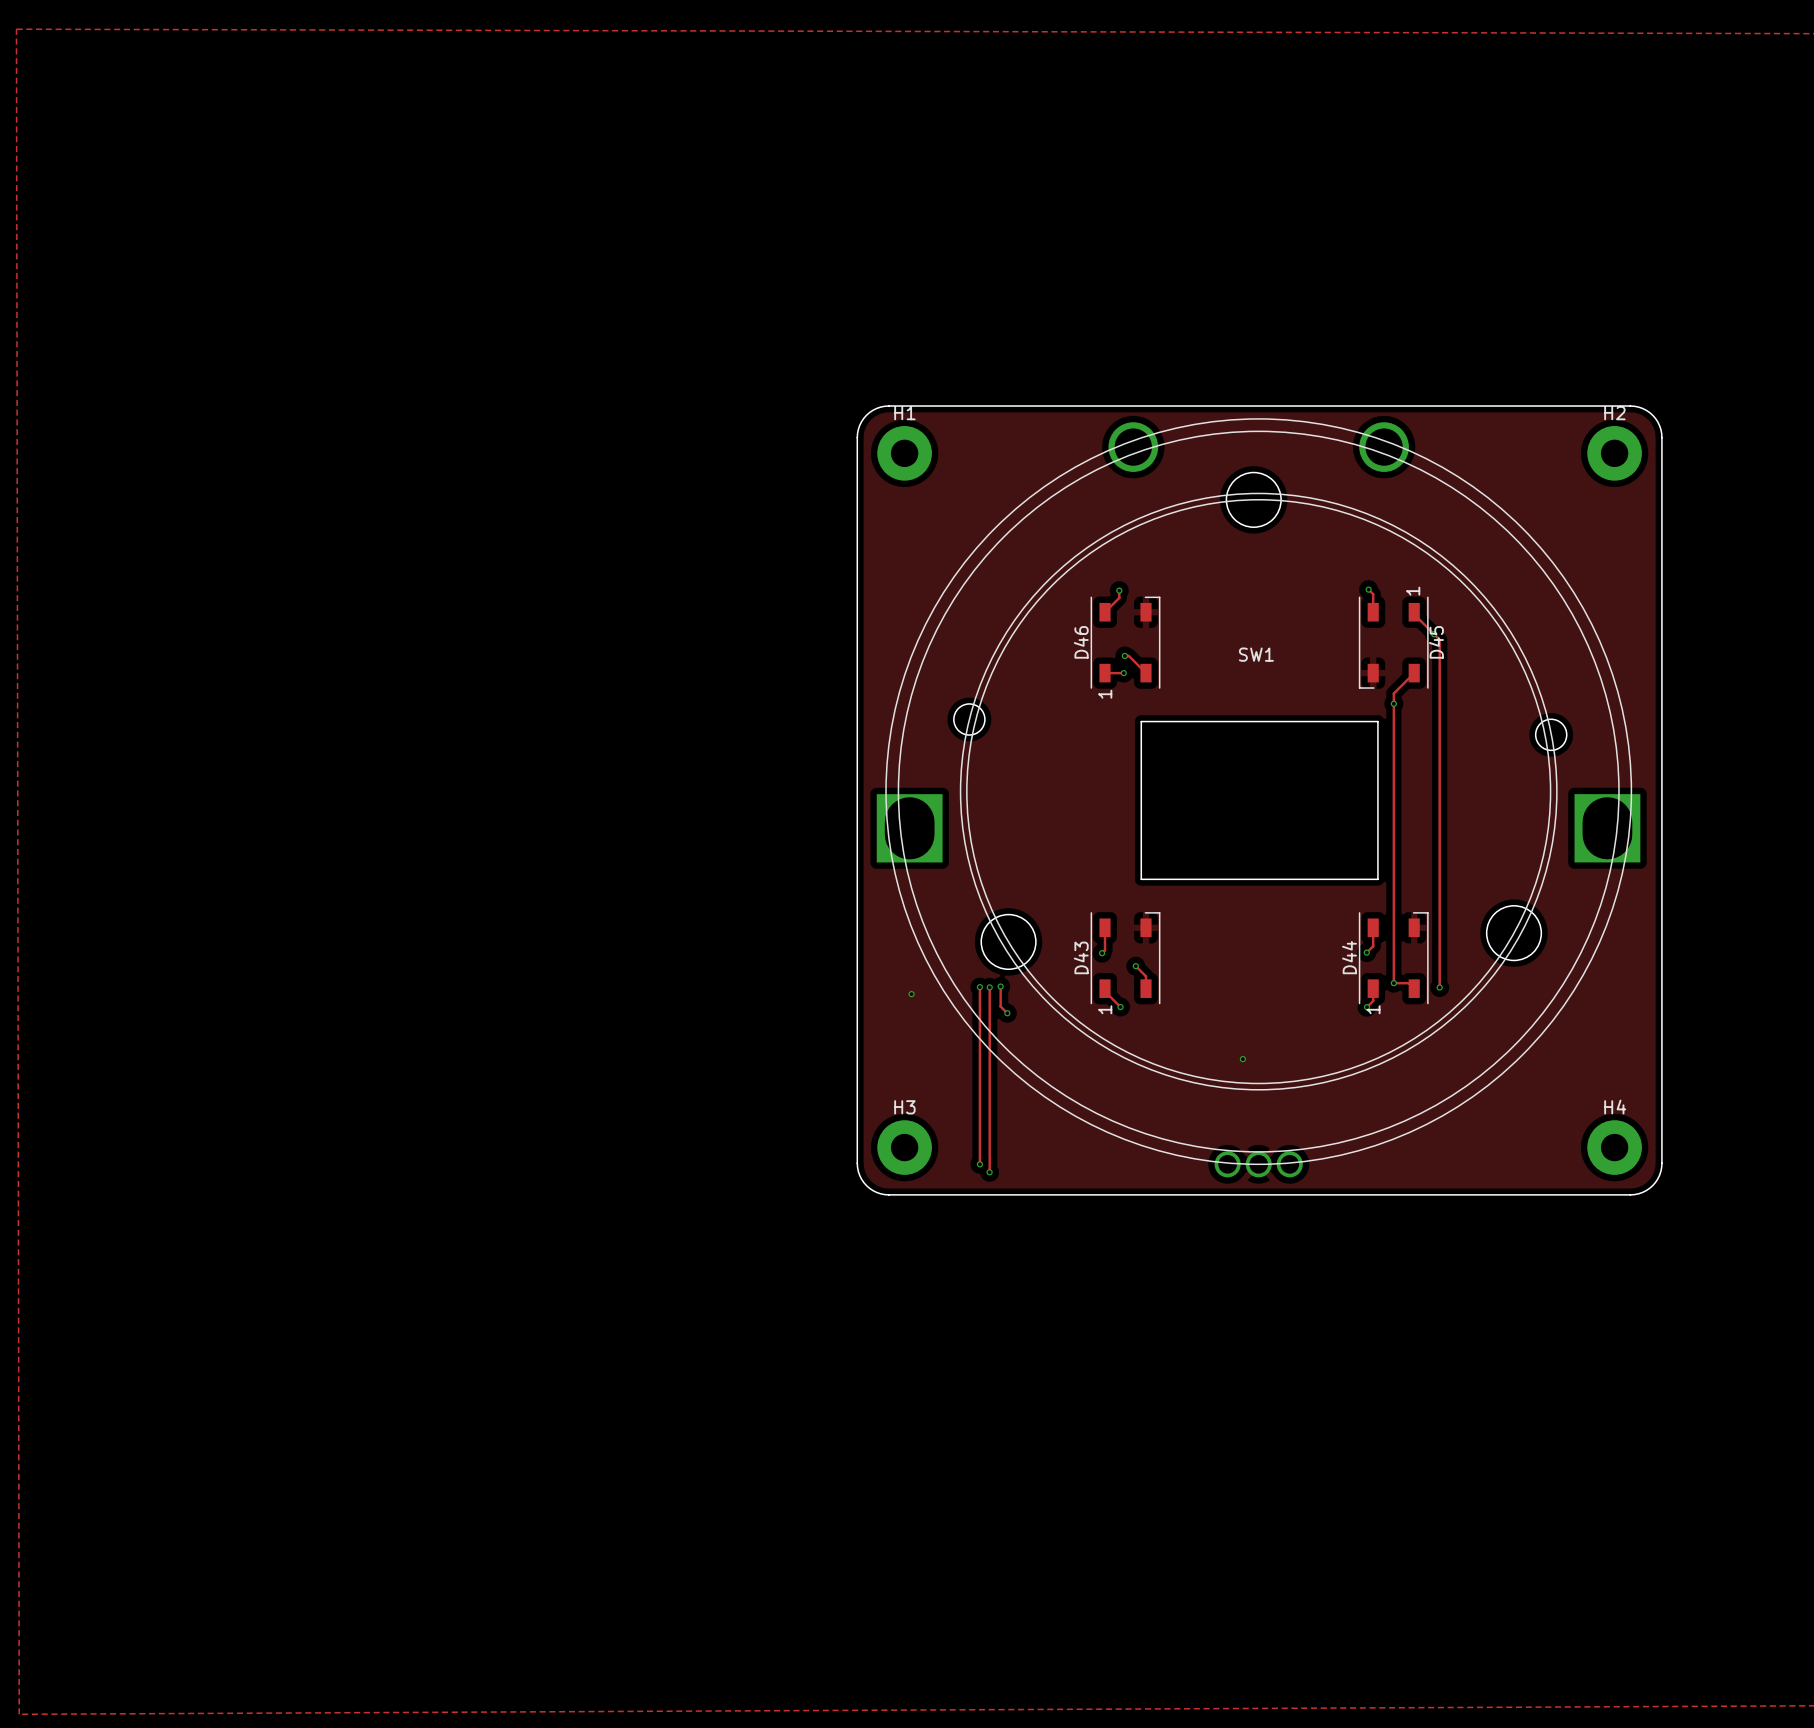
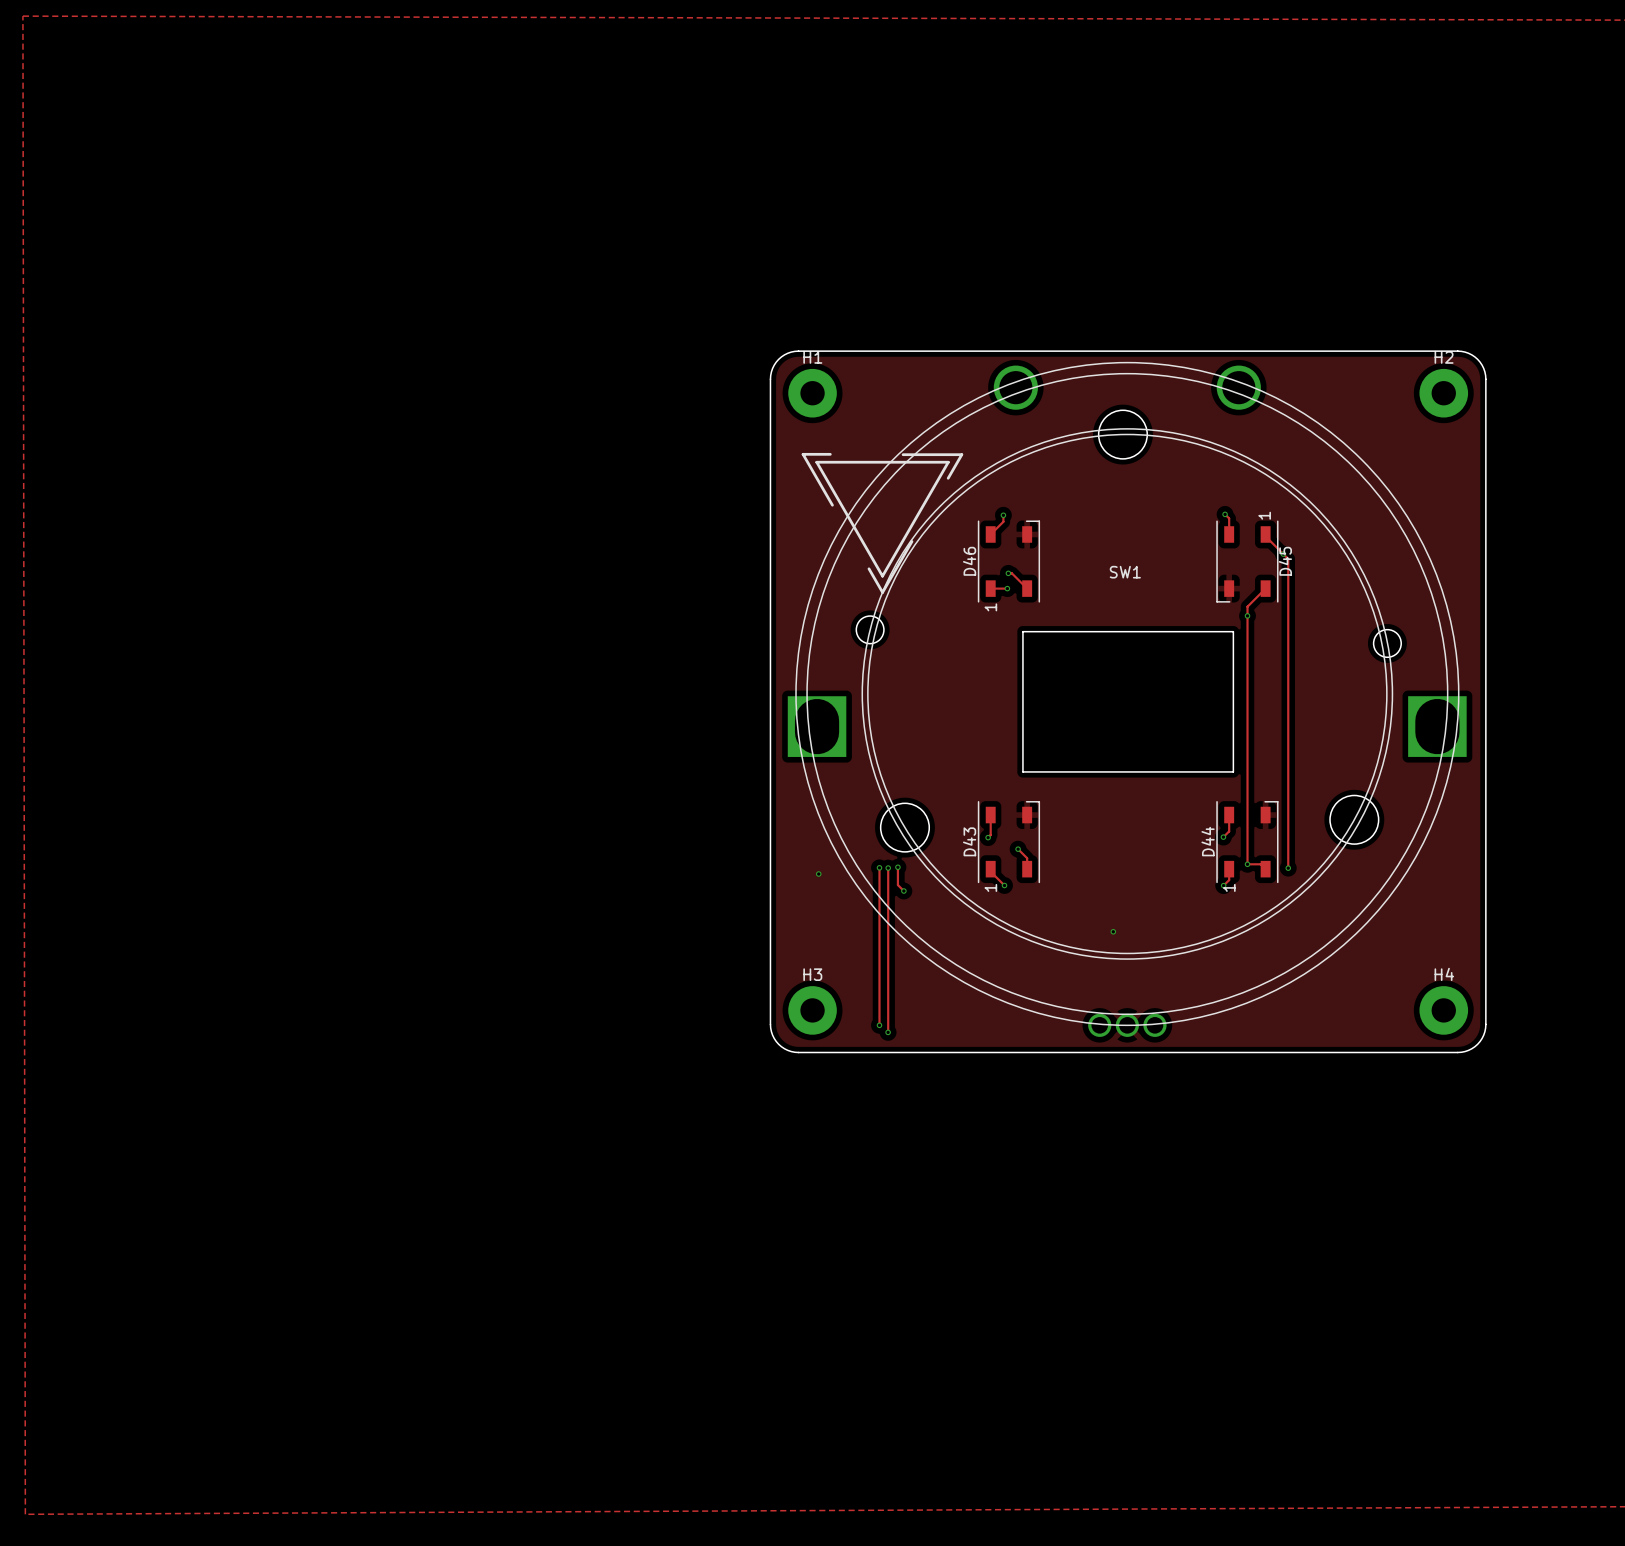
drawing: none -> [801, 452, 964, 594]

